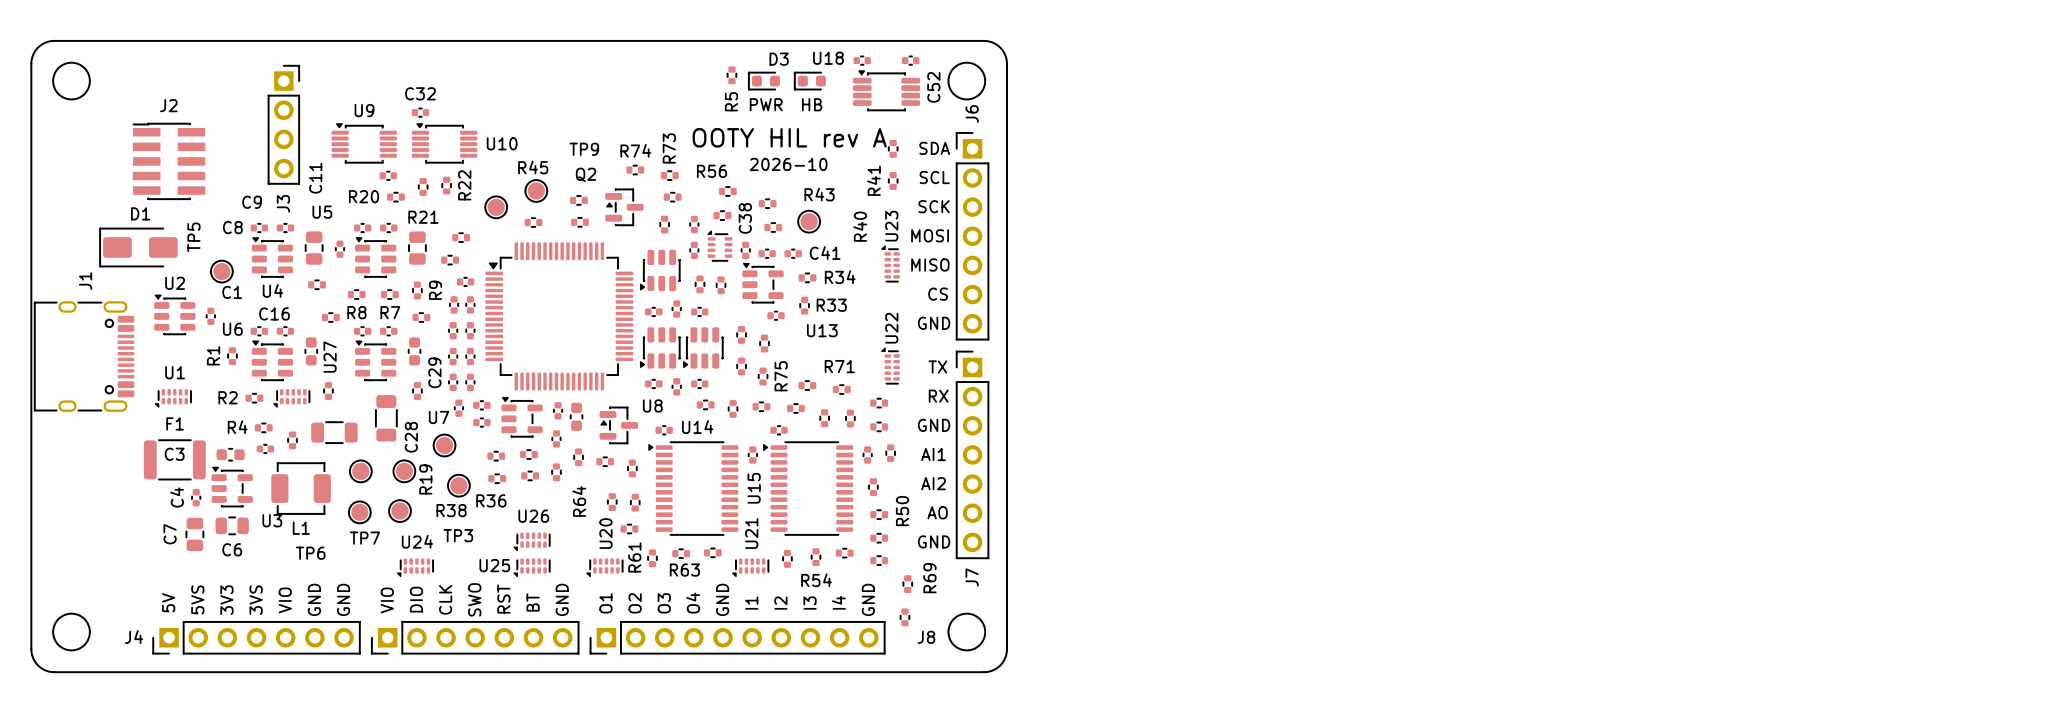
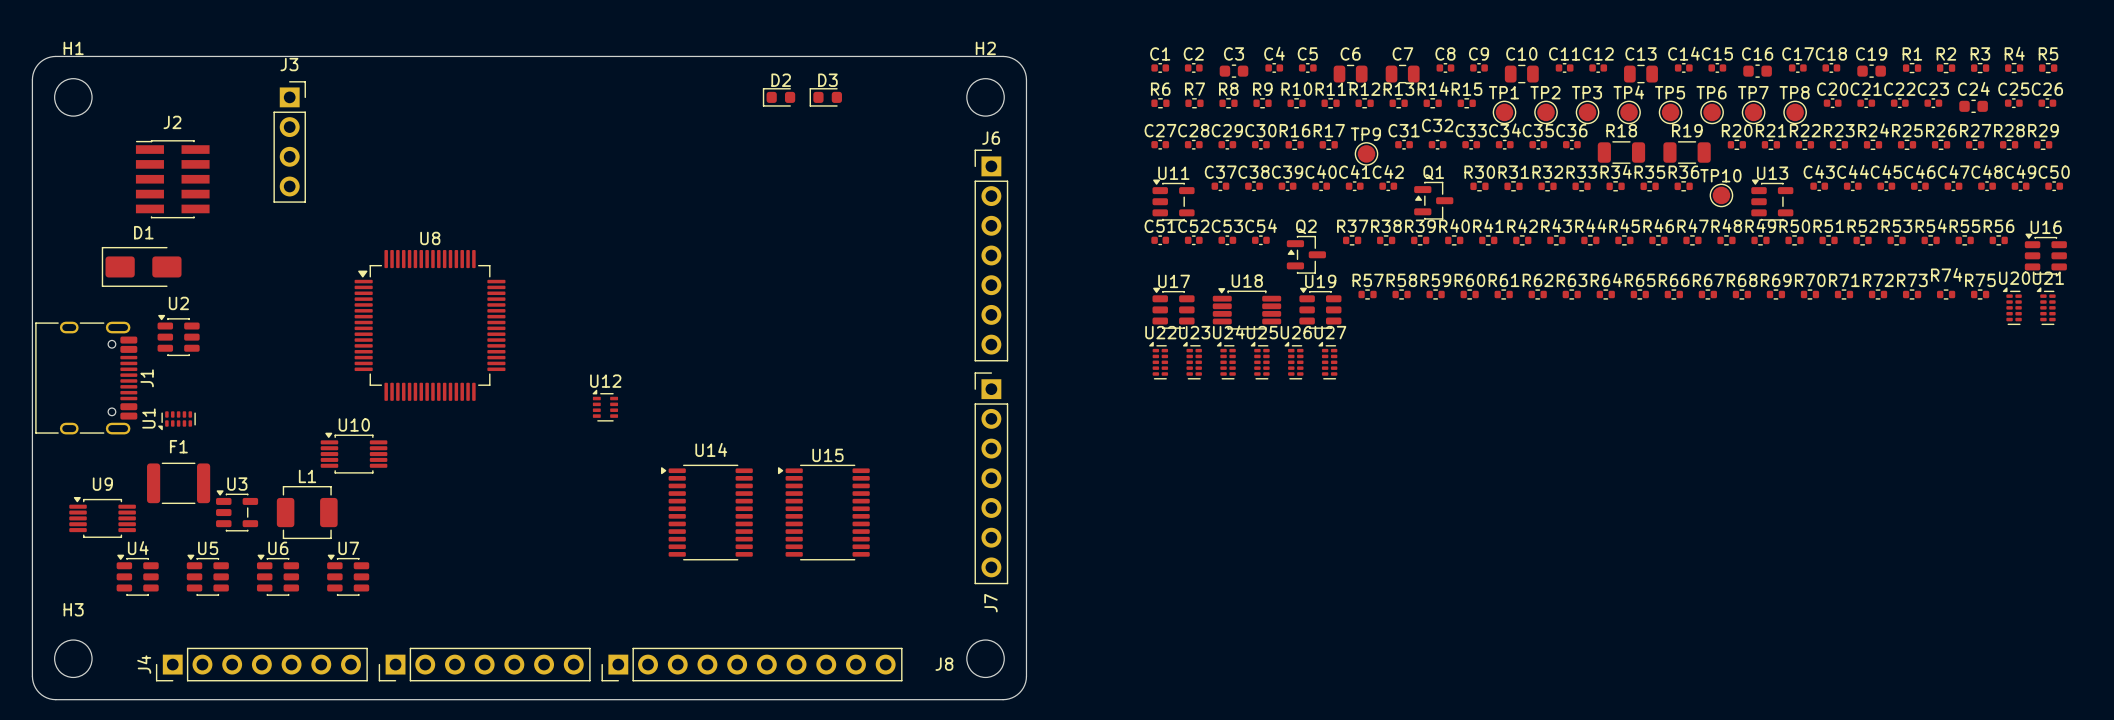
H1 name: none -> H1 (73, 48)
H2 name: none -> H2 (985, 48)
C2: none -> (1193, 67)
C5: none -> (1307, 67)
C12: none -> (1598, 67)
C14: none -> (1683, 67)
C15: none -> (1717, 67)
C17: none -> (1797, 67)
C18: none -> (1831, 67)
R3: none -> (1980, 68)
C19: none -> (1871, 71)
U18 name position: U18 (828, 58) -> U18 (1247, 280)
C10: none -> (1521, 74)
C13: none -> (1640, 74)
D3 name position: D3 (779, 59) -> D3 (827, 80)
part: (862, 60) -> none
C52 position: (910, 60) -> (1193, 240)
D2 name: none -> D2 (781, 80)
R5 rotation: 0° (731, 75) -> 90° clockwise (2048, 68)
R5 position: (731, 75) -> (2048, 68)
R6: none -> (1160, 103)
R10: none -> (1296, 103)
R11: none -> (1330, 103)
R12: none -> (1364, 103)
R13: none -> (1398, 103)
R14: none -> (1432, 103)
R15: none -> (1466, 103)
C20: none -> (1832, 103)
C21: none -> (1866, 103)
C22: none -> (1899, 103)
C23: none -> (1933, 103)
C25: none -> (2013, 103)
C26: none -> (2047, 103)
C52 name rotation: 0° (933, 87) -> 90° clockwise (1193, 226)
C52 name position: C52 (933, 87) -> C52 (1193, 226)
C24: none -> (1973, 106)
U18 position: (886, 90) -> (1246, 308)
TP1: none -> (1504, 112)
TP2: none -> (1546, 112)
TP4: none -> (1629, 112)
TP8: none -> (1795, 112)
R5 name position: R5 (731, 101) -> R5 (2048, 53)
text: PWR (766, 104) -> none
text: HB (812, 104) -> none
C32 position: (420, 112) -> (1437, 144)
J6 name rotation: 0° (972, 113) -> 90° clockwise (991, 138)
C27: none -> (1160, 144)
C30: none -> (1260, 144)
R16: none -> (1294, 144)
R17: none -> (1328, 144)
C31: none -> (1404, 144)
C33: none -> (1471, 144)
C34: none -> (1504, 144)
C35: none -> (1538, 144)
C36: none -> (1571, 144)
R23: none -> (1838, 144)
R24: none -> (1873, 144)
R25: none -> (1907, 144)
R26: none -> (1941, 144)
R27: none -> (1975, 144)
R28: none -> (2009, 144)
R29: none -> (2043, 144)
R18: none -> (1621, 152)
text: OOTY HIL rev A (789, 137) -> none
U9 position: (364, 143) -> (102, 517)
U10 position: (444, 143) -> (354, 453)
U10 name position: U10 (502, 143) -> U10 (354, 424)
R73 name rotation: 0° (669, 148) -> 90° clockwise (1912, 280)
R41 rotation: 0° (893, 148) -> 90° clockwise (1488, 240)
R41 position: (893, 148) -> (1488, 240)
text: SDA (934, 148) -> none
TP9 name position: TP9 (584, 149) -> TP9 (1365, 134)
text: 2026-10 (788, 164) -> none
R45 name position: R45 (533, 167) -> R45 (1624, 226)
C37: none -> (1220, 186)
C39: none -> (1287, 186)
C40: none -> (1321, 186)
C42: none -> (1388, 186)
R30: none -> (1479, 186)
R31: none -> (1513, 186)
R32: none -> (1547, 186)
R35: none -> (1649, 186)
C43: none -> (1819, 186)
C44: none -> (1852, 186)
C45: none -> (1886, 186)
C46: none -> (1919, 186)
C47: none -> (1953, 186)
C48: none -> (1987, 186)
C49: none -> (2020, 186)
C50: none -> (2054, 186)
R74 position: (635, 170) -> (1946, 294)
R56 name position: R56 (712, 171) -> R56 (1999, 226)
Q2 name position: Q2 (586, 174) -> Q2 (1306, 226)
part: (388, 175) -> none
R73 position: (669, 175) -> (1912, 294)
text: SCL (934, 177) -> none
TP10: none -> (1721, 195)
C11 name rotation: 0° (315, 178) -> 90° clockwise (1564, 53)
C11 name position: C11 (315, 178) -> C11 (1564, 53)
R41 name position: R41 (873, 180) -> R41 (1488, 226)
R40 rotation: 0° (893, 180) -> 90° clockwise (1454, 240)
R40 position: (893, 180) -> (1454, 240)
U11: none -> (1173, 200)
Q1: none -> (1433, 200)
R22 rotation: 0° (446, 185) -> 90° clockwise (1804, 144)
R22 position: (446, 185) -> (1804, 144)
R21 rotation: 0° (423, 186) -> 90° clockwise (1770, 144)
R21 position: (423, 186) -> (1770, 144)
TP9 position: (536, 190) -> (1366, 153)
part: (727, 191) -> none
R43 name position: R43 (819, 194) -> R43 (1556, 226)
R20 name position: R20 (364, 196) -> R20 (1737, 130)
R20 position: (395, 197) -> (1736, 144)
R56 position: (672, 197) -> (1998, 240)
R45 position: (578, 200) -> (1624, 240)
C9 name position: C9 (252, 202) -> C9 (1479, 53)
J3 name rotation: 0° (283, 203) -> 90° clockwise (289, 64)
J3 name position: J3 (283, 203) -> J3 (289, 64)
part: (767, 203) -> none
text: SCK (934, 206) -> none
part: (496, 207) -> none
Q2 position: (624, 207) -> (1306, 254)
U5 name position: U5 (322, 212) -> U5 (208, 548)
part: (722, 215) -> none
R21 name position: R21 (423, 217) -> R21 (1771, 130)
part: (809, 221) -> none
C51: none -> (1160, 240)
C53: none -> (1227, 240)
C54: none -> (1260, 240)
R37: none -> (1352, 240)
R39: none -> (1420, 240)
R42: none -> (1522, 240)
R44: none -> (1590, 240)
R46: none -> (1658, 240)
R47: none -> (1692, 240)
R48: none -> (1726, 240)
R49: none -> (1760, 240)
R51: none -> (1828, 240)
R52: none -> (1862, 240)
R53: none -> (1896, 240)
R55: none -> (1964, 240)
part: (533, 222) -> none
part: (579, 222) -> none
part: (664, 224) -> none
part: (694, 224) -> none
R40 name position: R40 (860, 226) -> R40 (1454, 226)
U23 name rotation: 0° (891, 226) -> 90° clockwise (1194, 332)
C8 name position: C8 (232, 227) -> C8 (1445, 53)
C8 position: (259, 227) -> (1445, 67)
C9 position: (285, 227) -> (1479, 67)
C11 position: (362, 227) -> (1564, 67)
part: (388, 227) -> none
R43 position: (773, 227) -> (1556, 240)
U16: none -> (2045, 254)
text: MOSI (930, 235) -> none
TP5 name rotation: 0° (193, 237) -> 90° clockwise (1670, 92)
part: (461, 237) -> none
part: (719, 245) -> none
part: (314, 248) -> none
part: (417, 248) -> none
part: (339, 249) -> none
part: (694, 250) -> none
C38 rotation: 0° (745, 250) -> 90° clockwise (1254, 186)
C38 position: (745, 250) -> (1254, 186)
part: (767, 253) -> none
C41 position: (793, 253) -> (1354, 186)
C41 name position: C41 (825, 253) -> C41 (1354, 171)
U4 position: (272, 257) -> (137, 575)
U5 position: (375, 257) -> (207, 575)
part: (450, 260) -> none
U23 position: (890, 263) -> (1192, 360)
text: MISO (930, 264) -> none
part: (660, 270) -> none
TP5 position: (221, 271) -> (1670, 112)
R57: none -> (1367, 294)
R58: none -> (1401, 294)
R59: none -> (1435, 294)
R60: none -> (1469, 294)
R62: none -> (1537, 294)
R65: none -> (1639, 294)
R66: none -> (1673, 294)
R67: none -> (1707, 294)
R68: none -> (1741, 294)
R70: none -> (1809, 294)
R72: none -> (1878, 294)
R34 position: (807, 277) -> (1615, 186)
R34 name position: R34 (840, 277) -> R34 (1616, 171)
J1 name position: J1 (85, 281) -> J1 (147, 378)
part: (465, 281) -> none
U13 position: (762, 283) -> (1772, 200)
part: (317, 284) -> none
part: (700, 284) -> none
part: (721, 285) -> none
U17: none -> (1173, 308)
U19: none -> (1320, 308)
U4 name position: U4 (272, 290) -> U4 (138, 548)
R9 rotation: 0° (417, 290) -> 90° clockwise (1262, 103)
R9 position: (417, 290) -> (1262, 103)
C1 name position: C1 (232, 292) -> C1 (1160, 53)
R8 position: (356, 294) -> (1228, 103)
R7 position: (389, 294) -> (1194, 103)
text: CS (938, 294) -> none
part: (454, 304) -> none
part: (470, 304) -> none
R33 rotation: 0° (804, 305) -> 90° clockwise (1581, 186)
R33 position: (804, 305) -> (1581, 186)
R33 name position: R33 (831, 305) -> R33 (1581, 172)
part: (676, 309) -> none
part: (653, 311) -> none
part: (699, 311) -> none
R8 name position: R8 (356, 312) -> R8 (1228, 89)
R7 name position: R7 (390, 312) -> R7 (1195, 89)
C16 name position: C16 (274, 313) -> C16 (1757, 53)
part: (776, 315) -> none
C1 rotation: 0° (210, 316) -> 90° clockwise (1160, 67)
C1 position: (210, 316) -> (1160, 67)
U8 position: (559, 316) -> (430, 325)
part: (330, 317) -> none
part: (421, 317) -> none
text: GND (934, 323) -> none
U22 name rotation: 0° (891, 328) -> 90° clockwise (1160, 332)
U6 name position: U6 (232, 329) -> U6 (278, 548)
part: (453, 330) -> none
part: (470, 330) -> none
U13 name position: U13 (822, 330) -> U13 (1772, 173)
part: (259, 331) -> none
part: (285, 331) -> none
part: (362, 331) -> none
part: (388, 331) -> none
part: (741, 334) -> none
part: (764, 343) -> none
part: (660, 347) -> none
part: (703, 347) -> none
C16 rotation: 0° (311, 351) -> 90° clockwise (1757, 71)
C16 position: (311, 351) -> (1757, 71)
part: (414, 351) -> none
R1 rotation: 0° (232, 356) -> 90° clockwise (1912, 68)
R1 position: (232, 356) -> (1912, 68)
part: (453, 356) -> none
part: (470, 356) -> none
U27 name position: U27 (330, 357) -> U27 (1330, 332)
U6 position: (272, 360) -> (278, 575)
U7 position: (375, 360) -> (348, 575)
U22 position: (890, 365) -> (1158, 360)
part: (741, 366) -> none
R71 name position: R71 (839, 366) -> R71 (1844, 280)
text: TX (937, 367) -> none
U1 name rotation: 0° (175, 372) -> 90° counterclockwise (148, 418)
U1 name position: U1 (175, 372) -> U1 (148, 418)
C29 name rotation: 0° (434, 372) -> 90° clockwise (1227, 130)
C29 name position: C29 (434, 372) -> C29 (1227, 130)
R75 rotation: 0° (763, 376) -> 90° clockwise (1980, 294)
R75 position: (763, 376) -> (1980, 294)
C28 rotation: 0° (453, 382) -> 90° clockwise (1193, 144)
C28 position: (453, 382) -> (1193, 144)
part: (470, 382) -> none
U12: none -> (605, 405)
part: (653, 383) -> none
part: (699, 383) -> none
R71 position: (807, 385) -> (1844, 294)
part: (676, 386) -> none
part: (841, 389) -> none
part: (328, 390) -> none
part: (417, 390) -> none
text: RX (938, 396) -> none
R2 name position: R2 (228, 397) -> R2 (1946, 53)
R2 position: (254, 398) -> (1946, 68)
U27 rotation: 0° (291, 398) -> 90° clockwise (1327, 360)
U27 position: (291, 398) -> (1327, 360)
part: (879, 403) -> none
part: (705, 404) -> none
part: (481, 405) -> none
U8 name position: U8 (652, 405) -> U8 (430, 238)
part: (761, 406) -> none
part: (458, 408) -> none
part: (733, 408) -> none
part: (795, 408) -> none
part: (558, 410) -> none
part: (576, 416) -> none
U7 name position: U7 (439, 417) -> U7 (348, 548)
part: (522, 417) -> none
R19 rotation: 0° (386, 418) -> 90° clockwise (1687, 152)
R19 position: (386, 418) -> (1687, 152)
part: (824, 418) -> none
part: (850, 418) -> none
C29 position: (481, 422) -> (1227, 144)
part: (618, 425) -> none
text: GND (934, 425) -> none
part: (879, 426) -> none
R4 name position: R4 (237, 427) -> R4 (2014, 53)
R4 position: (263, 427) -> (2014, 68)
part: (664, 430) -> none
part: (779, 430) -> none
part: (334, 432) -> none
C28 name position: C28 (411, 437) -> C28 (1193, 130)
part: (556, 438) -> none
part: (292, 440) -> none
part: (444, 445) -> none
part: (265, 448) -> none
part: (890, 453) -> none
C3 name position: C3 (174, 454) -> C3 (1234, 53)
C3 position: (230, 454) -> (1234, 71)
part: (528, 454) -> none
part: (752, 454) -> none
part: (867, 454) -> none
text: AI1 (933, 454) -> none
part: (496, 456) -> none
part: (578, 457) -> none
part: (605, 461) -> none
part: (632, 468) -> none
part: (360, 471) -> none
part: (404, 471) -> none
part: (556, 472) -> none
R36 position: (530, 475) -> (1683, 186)
R38 position: (497, 478) -> (1386, 240)
R19 name position: R19 (425, 479) -> R19 (1687, 130)
text: AI2 (933, 483) -> none
TP3 position: (458, 485) -> (1587, 112)
part: (873, 487) -> none
U15 name rotation: 0° (754, 488) -> 90° clockwise (827, 455)
U15 name position: U15 (754, 488) -> U15 (827, 455)
C4 rotation: 0° (196, 497) -> 90° clockwise (1274, 67)
C4 position: (196, 497) -> (1274, 67)
R36 name position: R36 (491, 500) -> R36 (1683, 172)
R64 rotation: 0° (612, 502) -> 90° clockwise (1605, 294)
R64 position: (612, 502) -> (1605, 294)
R61 rotation: 0° (635, 502) -> 90° clockwise (1503, 294)
R61 position: (635, 502) -> (1503, 294)
R38 name position: R38 (451, 510) -> R38 (1386, 226)
TP7 position: (399, 511) -> (1753, 112)
R50 name rotation: 0° (902, 511) -> 90° clockwise (1794, 226)
TP6 position: (359, 512) -> (1712, 112)
text: AO (937, 512) -> none
part: (879, 514) -> none
U3 name position: U3 (272, 520) -> U3 (237, 484)
C6 position: (232, 525) -> (1350, 74)
L1 name position: L1 (301, 528) -> L1 (307, 476)
R63 position: (629, 529) -> (1571, 294)
C7 rotation: 0° (194, 534) -> 90° clockwise (1402, 74)
C7 position: (194, 534) -> (1402, 74)
TP3 name position: TP3 (458, 535) -> TP3 (1586, 92)
TP7 name position: TP7 (364, 538) -> TP7 (1753, 92)
R50 position: (879, 538) -> (1794, 240)
U26 rotation: 0° (531, 541) -> 90° clockwise (1294, 360)
U26 position: (531, 541) -> (1294, 360)
text: GND (934, 541) -> none
C6 name position: C6 (232, 549) -> C6 (1350, 53)
part: (712, 552) -> none
TP6 name position: TP6 (310, 553) -> TP6 (1711, 92)
part: (681, 553) -> none
part: (844, 553) -> none
R61 name position: R61 (634, 557) -> R61 (1503, 280)
R54 rotation: 0° (816, 557) -> 90° clockwise (1930, 240)
R54 position: (816, 557) -> (1930, 240)
part: (652, 558) -> none
part: (787, 558) -> none
part: (879, 560) -> none
U24 rotation: 0° (415, 567) -> 90° clockwise (1226, 360)
U24 position: (415, 567) -> (1226, 360)
U25 rotation: 0° (531, 567) -> 90° clockwise (1260, 360)
U25 position: (531, 567) -> (1260, 360)
U20 rotation: 0° (604, 567) -> 90° clockwise (2012, 306)
U20 position: (604, 567) -> (2012, 306)
U21 rotation: 0° (750, 567) -> 90° clockwise (2046, 306)
U21 position: (750, 567) -> (2046, 306)
R63 name position: R63 (684, 570) -> R63 (1572, 280)
R69 name position: R69 (929, 578) -> R69 (1776, 280)
R54 name position: R54 (816, 580) -> R54 (1931, 226)
H3 name: none -> H3 (73, 609)
part: (907, 584) -> none
text: 5VS (197, 599) -> none
text: GND (314, 599) -> none
text: GND (343, 599) -> none
text: DIO (416, 599) -> none
text: CLK (445, 599) -> none
text: SWO (474, 599) -> none
text: RST (503, 599) -> none
text: GND (562, 599) -> none
text: GND (722, 599) -> none
text: GND (868, 599) -> none
text: 3V3 (226, 600) -> none
text: 3VS (256, 600) -> none
text: VIO (285, 600) -> none
text: VIO (387, 600) -> none
text: 5V (168, 602) -> none
text: BT (533, 602) -> none
text: I4 (838, 602) -> none
text: O1 (605, 603) -> none
text: O2 (635, 603) -> none
text: O3 (664, 603) -> none
text: O4 (693, 603) -> none
text: I1 (751, 603) -> none
text: I2 (780, 603) -> none
text: I3 (810, 603) -> none
R69 rotation: 0° (904, 617) -> 90° clockwise (1775, 294)
R69 position: (904, 617) -> (1775, 294)
J4 name rotation: 0° (133, 637) -> 90° counterclockwise (144, 664)

